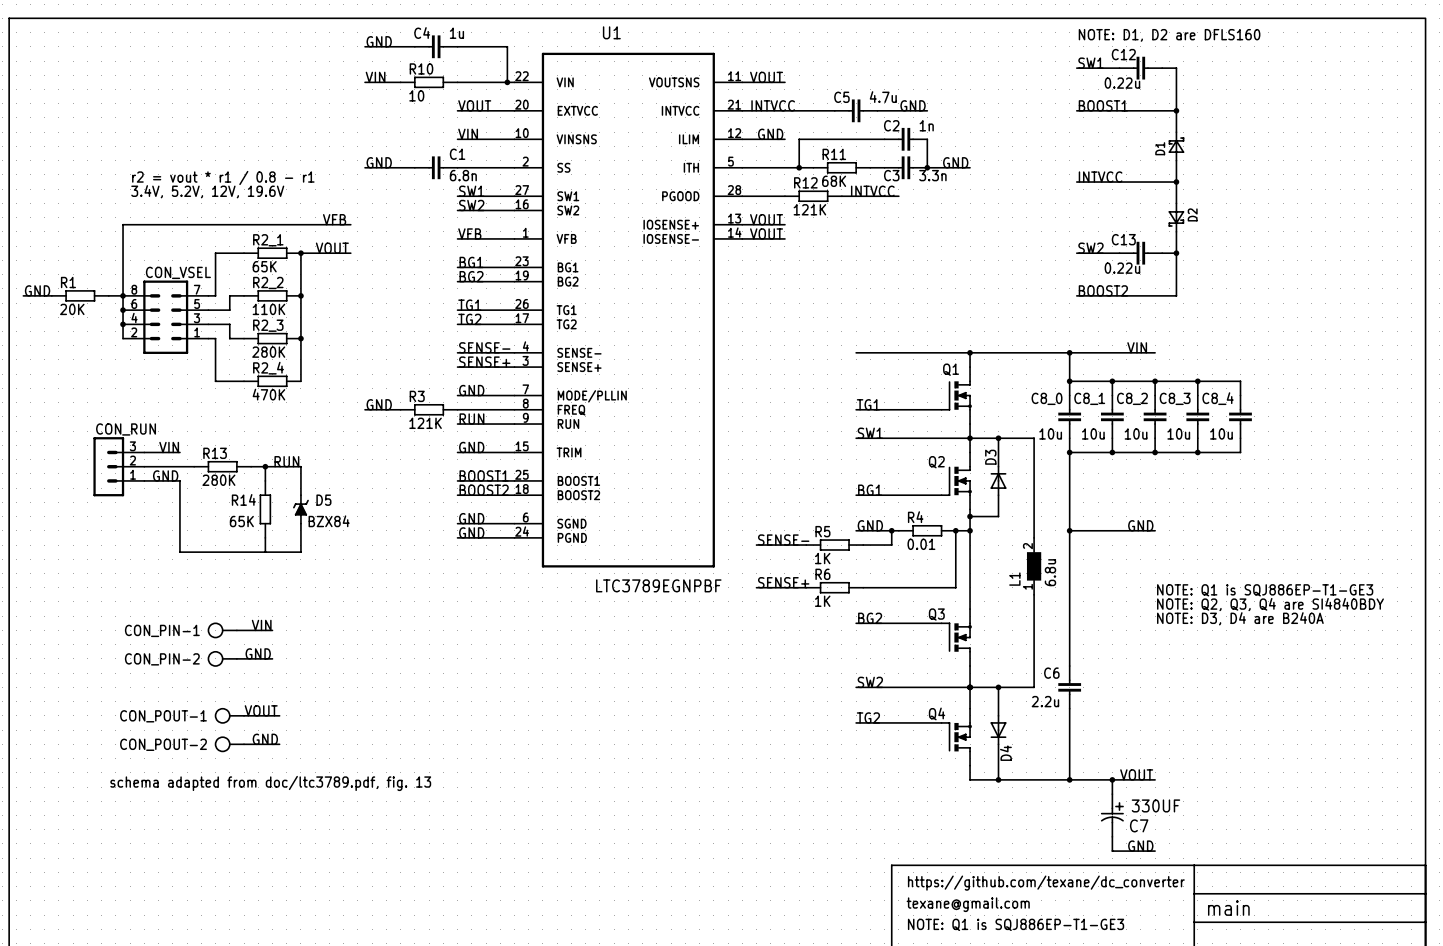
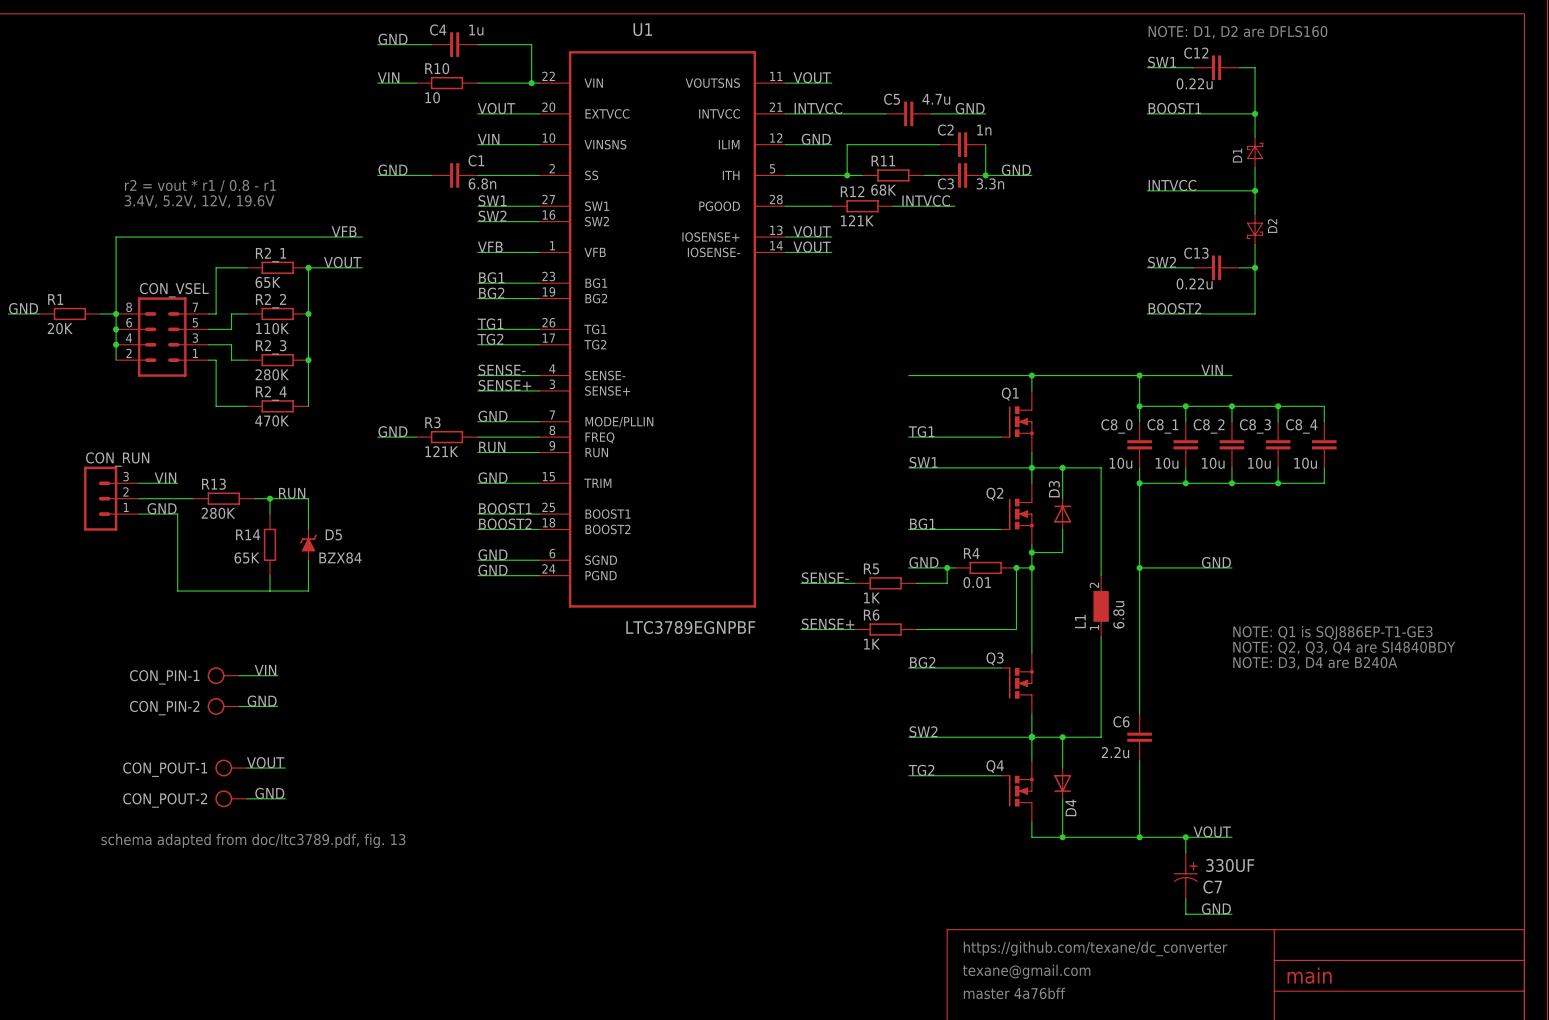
text: NOTE: Q1 is SQJ886EP-T1-GE3 (1016, 924) -> master 4a76bff (1014, 993)

